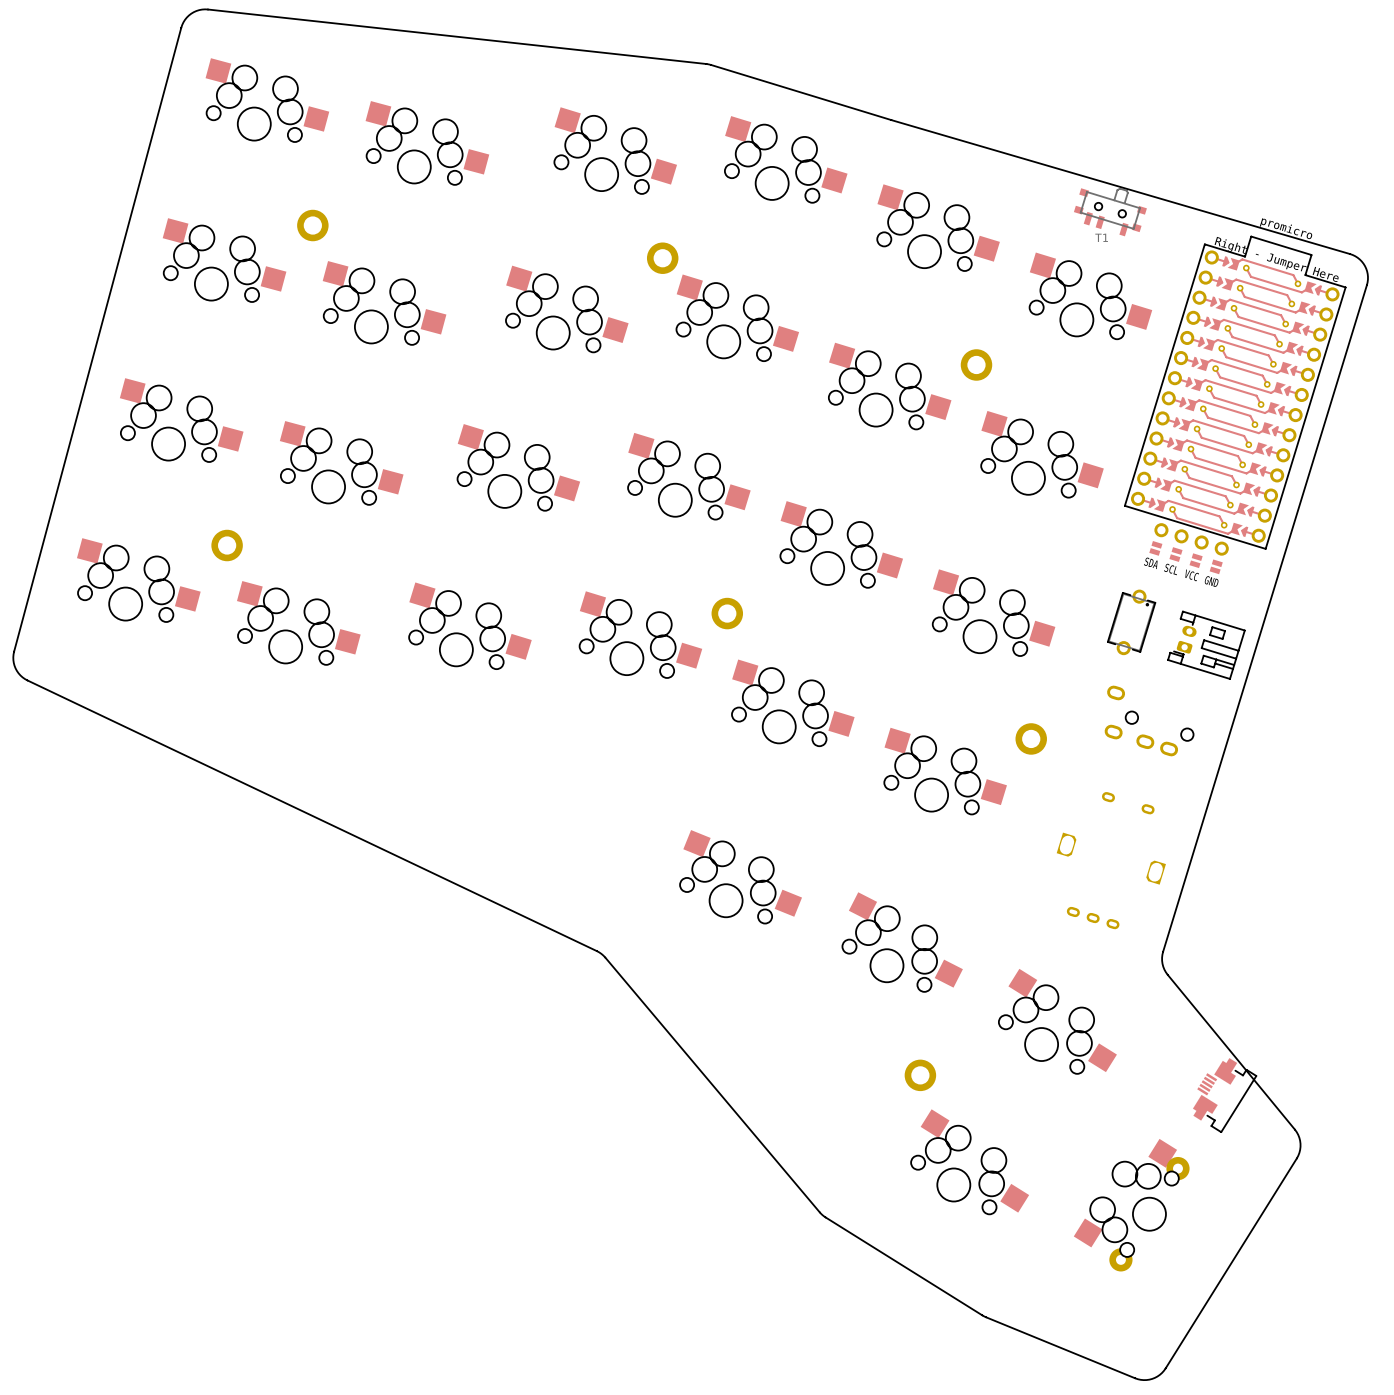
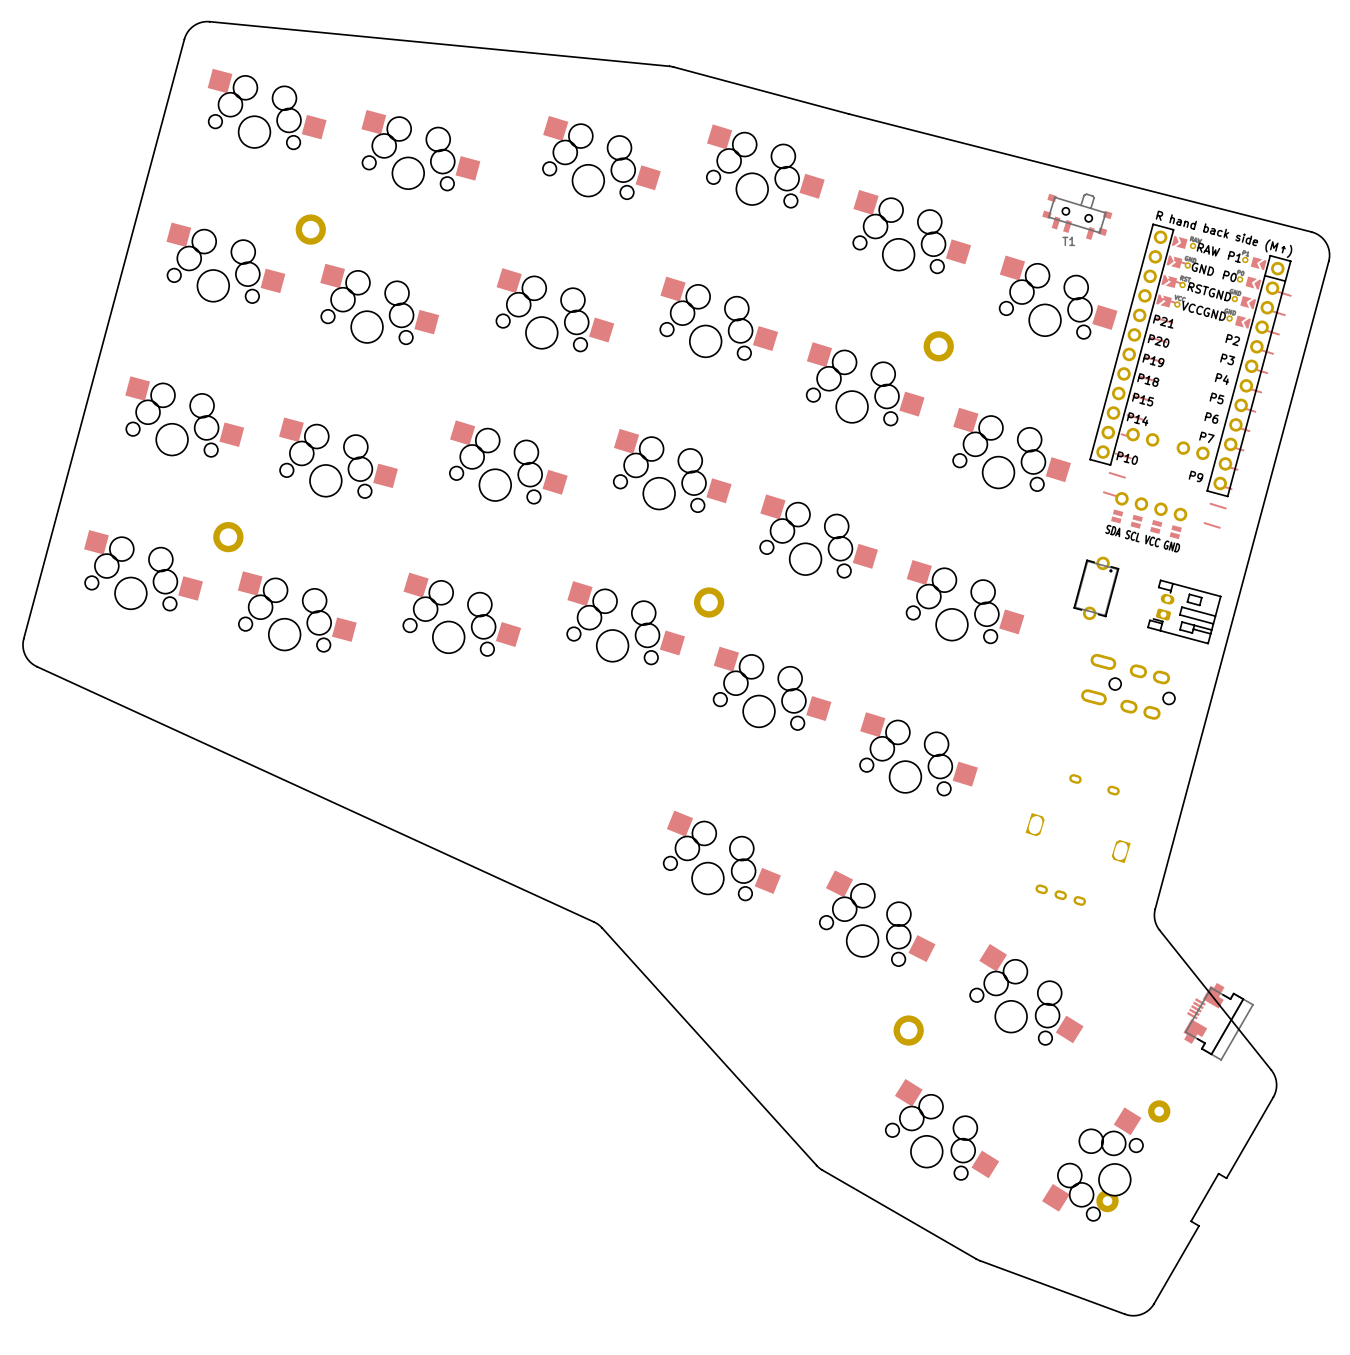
board edge: (181, 27) (185, 19) (191, 13) (199, 10) (207, 9) (708, 64) (891, 120) (1350, 254) (1359, 259) (1367, 271) (1366, 285) (1162, 957) (1163, 966) (1167, 974) (1296, 1132) (1300, 1143) (1298, 1155) (1163, 1370) (1157, 1376) (1149, 1379) (1135, 1378) (984, 1316) (824, 1216) (599, 952) (27, 680) (15, 668) (13, 660) (14, 651) -> (184, 39) (187, 31) (193, 25) (209, 21) (671, 66) (848, 113) (1311, 232) (1323, 238) (1329, 250) (1328, 261) (1154, 914) (1159, 930) (1273, 1072) (1276, 1083) (1274, 1094) (1226, 1178) (1218, 1173) (1191, 1221) (1199, 1225) (1152, 1306) (1141, 1314) (1125, 1314) (978, 1259) (820, 1169) (596, 923) (36, 666) (25, 655) (23, 638)
part: (662, 258) -> none
track: (1234, 264) (1242, 259) (1293, 275) (1298, 283) -> none
track: (1246, 268) (1250, 276) (1301, 292) (1310, 287) -> none
track: (1228, 284) (1236, 279) (1287, 295) (1291, 303) -> none
track: (1240, 288) (1244, 296) (1295, 312) (1303, 307) -> none
track: (1222, 304) (1230, 299) (1281, 315) (1285, 324) -> none
track: (1233, 308) (1238, 317) (1289, 332) (1297, 327) -> none
track: (1215, 324) (1223, 319) (1274, 335) (1279, 344) -> none
track: (1227, 328) (1232, 337) (1283, 352) (1291, 347) -> none
track: (1209, 344) (1217, 339) (1268, 355) (1273, 364) -> none
track: (1221, 348) (1226, 357) (1277, 372) (1285, 367) -> none
part: none -> (1190, 360)
part position: (976, 364) -> (938, 346)
track: (1203, 364) (1211, 360) (1262, 375) (1267, 384) -> none
track: (1215, 368) (1220, 377) (1271, 392) (1279, 388) -> none
track: (1197, 385) (1205, 380) (1256, 395) (1261, 404) -> none
track: (1209, 388) (1214, 397) (1265, 413) (1273, 408) -> none
part: (1235, 392) -> none
track: (1191, 405) (1199, 400) (1250, 415) (1254, 424) -> none
track: (1203, 408) (1207, 417) (1258, 433) (1266, 428) -> none
track: (1185, 425) (1193, 420) (1244, 436) (1248, 444) -> none
track: (1197, 428) (1201, 437) (1252, 453) (1260, 448) -> none
track: (1179, 445) (1187, 440) (1238, 456) (1242, 464) -> none
track: (1191, 449) (1195, 457) (1246, 473) (1254, 468) -> none
track: (1172, 465) (1180, 460) (1231, 476) (1236, 484) -> none
track: (1184, 469) (1189, 477) (1240, 493) (1248, 488) -> none
track: (1166, 485) (1174, 480) (1225, 496) (1230, 505) -> none
track: (1178, 489) (1183, 498) (1234, 513) (1242, 508) -> none
track: (1160, 505) (1168, 500) (1219, 516) (1224, 525) -> none
track: (1172, 509) (1177, 518) (1228, 533) (1236, 528) -> none
part: none -> (1149, 515)
part: (1189, 548) -> none
part: none -> (1096, 588)
part: (1131, 622) -> none
part: none -> (1184, 611)
part: (1206, 645) -> none
part: none -> (1128, 686)
part: (1149, 720) -> none
part: (1031, 738) -> none
part: none -> (1218, 1021)
part position: (920, 1075) -> (908, 1030)
part: (1224, 1095) -> none
part position: (1177, 1168) -> (1159, 1111)
part position: (1120, 1259) -> (1107, 1201)

